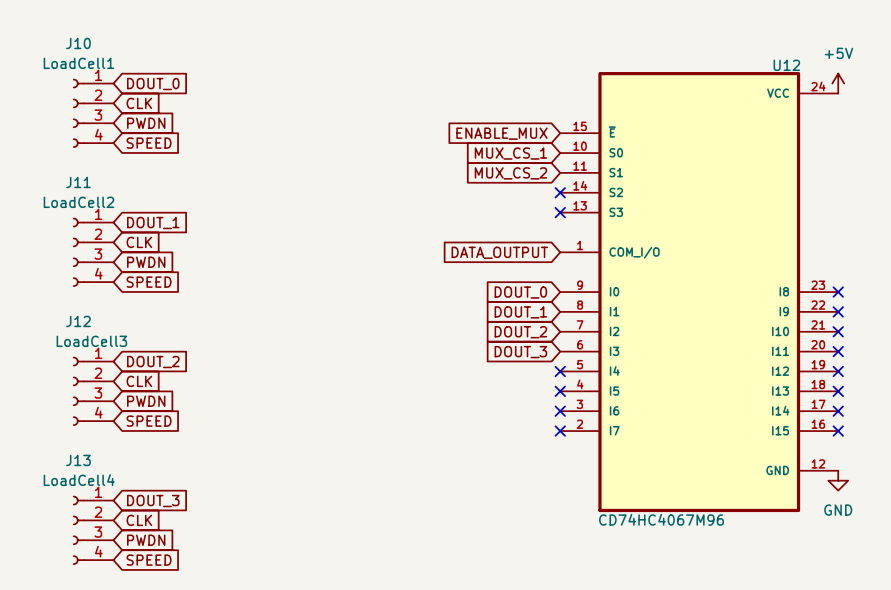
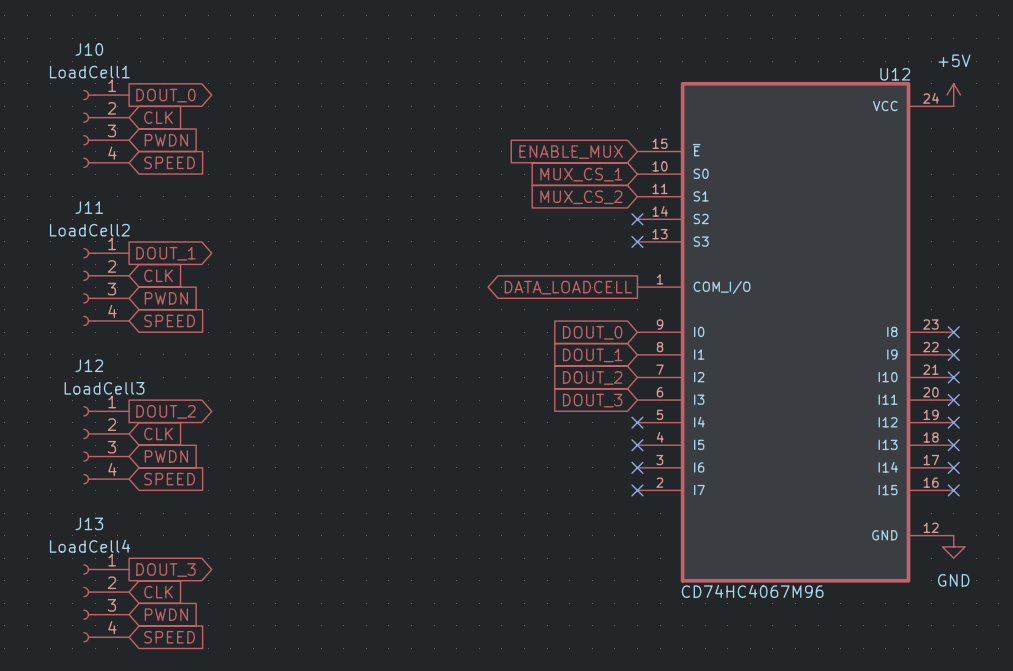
global label shape: input (153, 84) -> output (165, 95)
global label shape: input (153, 223) -> output (165, 253)
global label shape: input (499, 252) -> output (568, 287)
global label: DATA_OUTPUT (499, 252) -> DATA_LOADCELL (568, 287)
global label shape: input (153, 362) -> output (165, 411)
global label shape: input (153, 501) -> output (165, 570)

